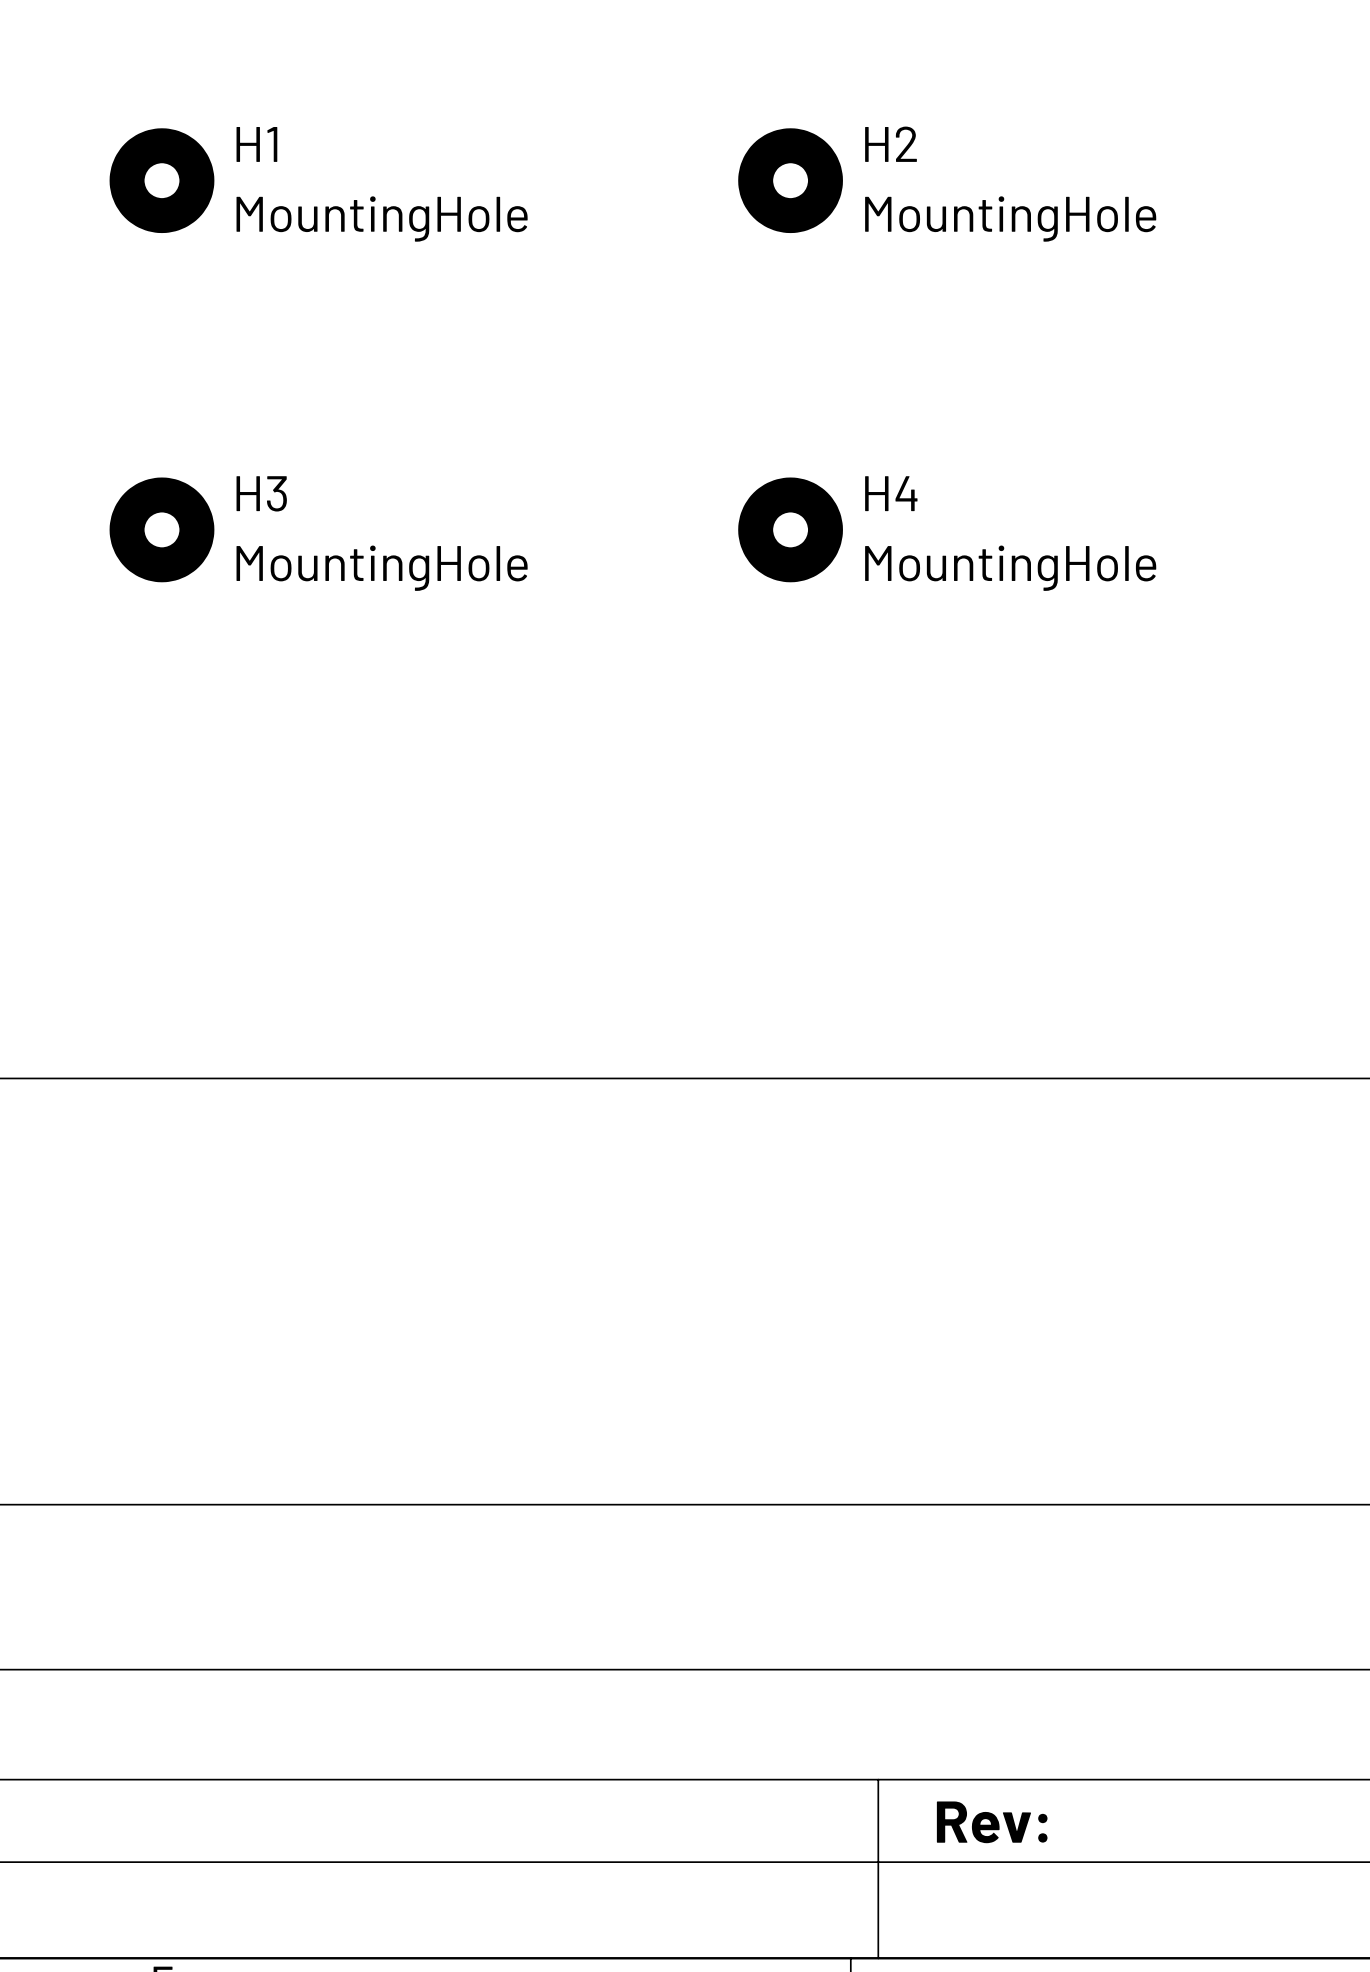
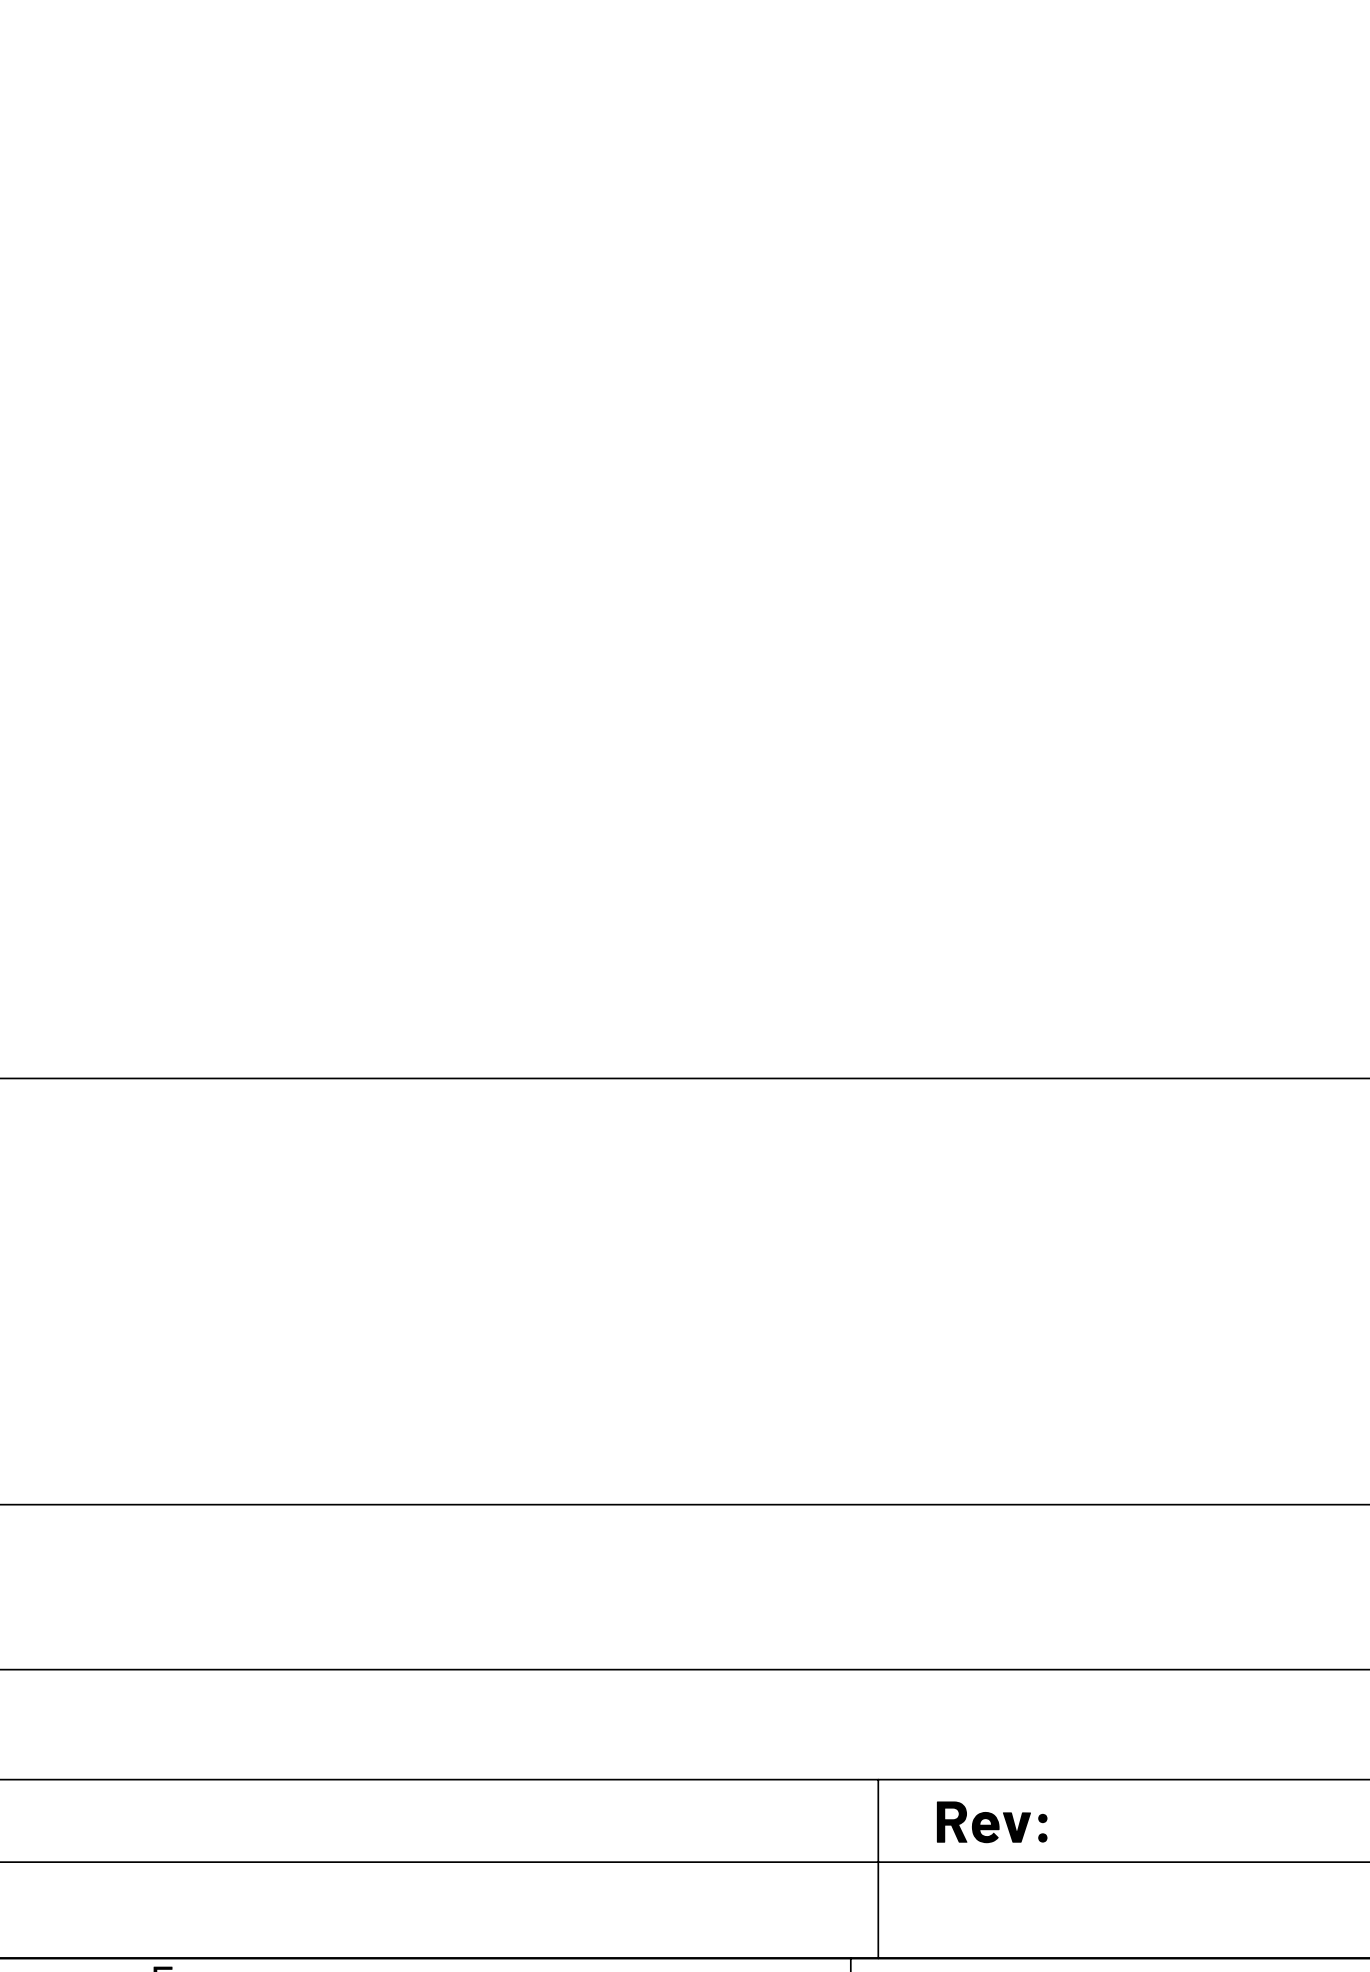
H1: MountingHole (161, 180) -> none
H2: MountingHole (790, 180) -> none
H3: MountingHole (161, 529) -> none
H4: MountingHole (790, 529) -> none

